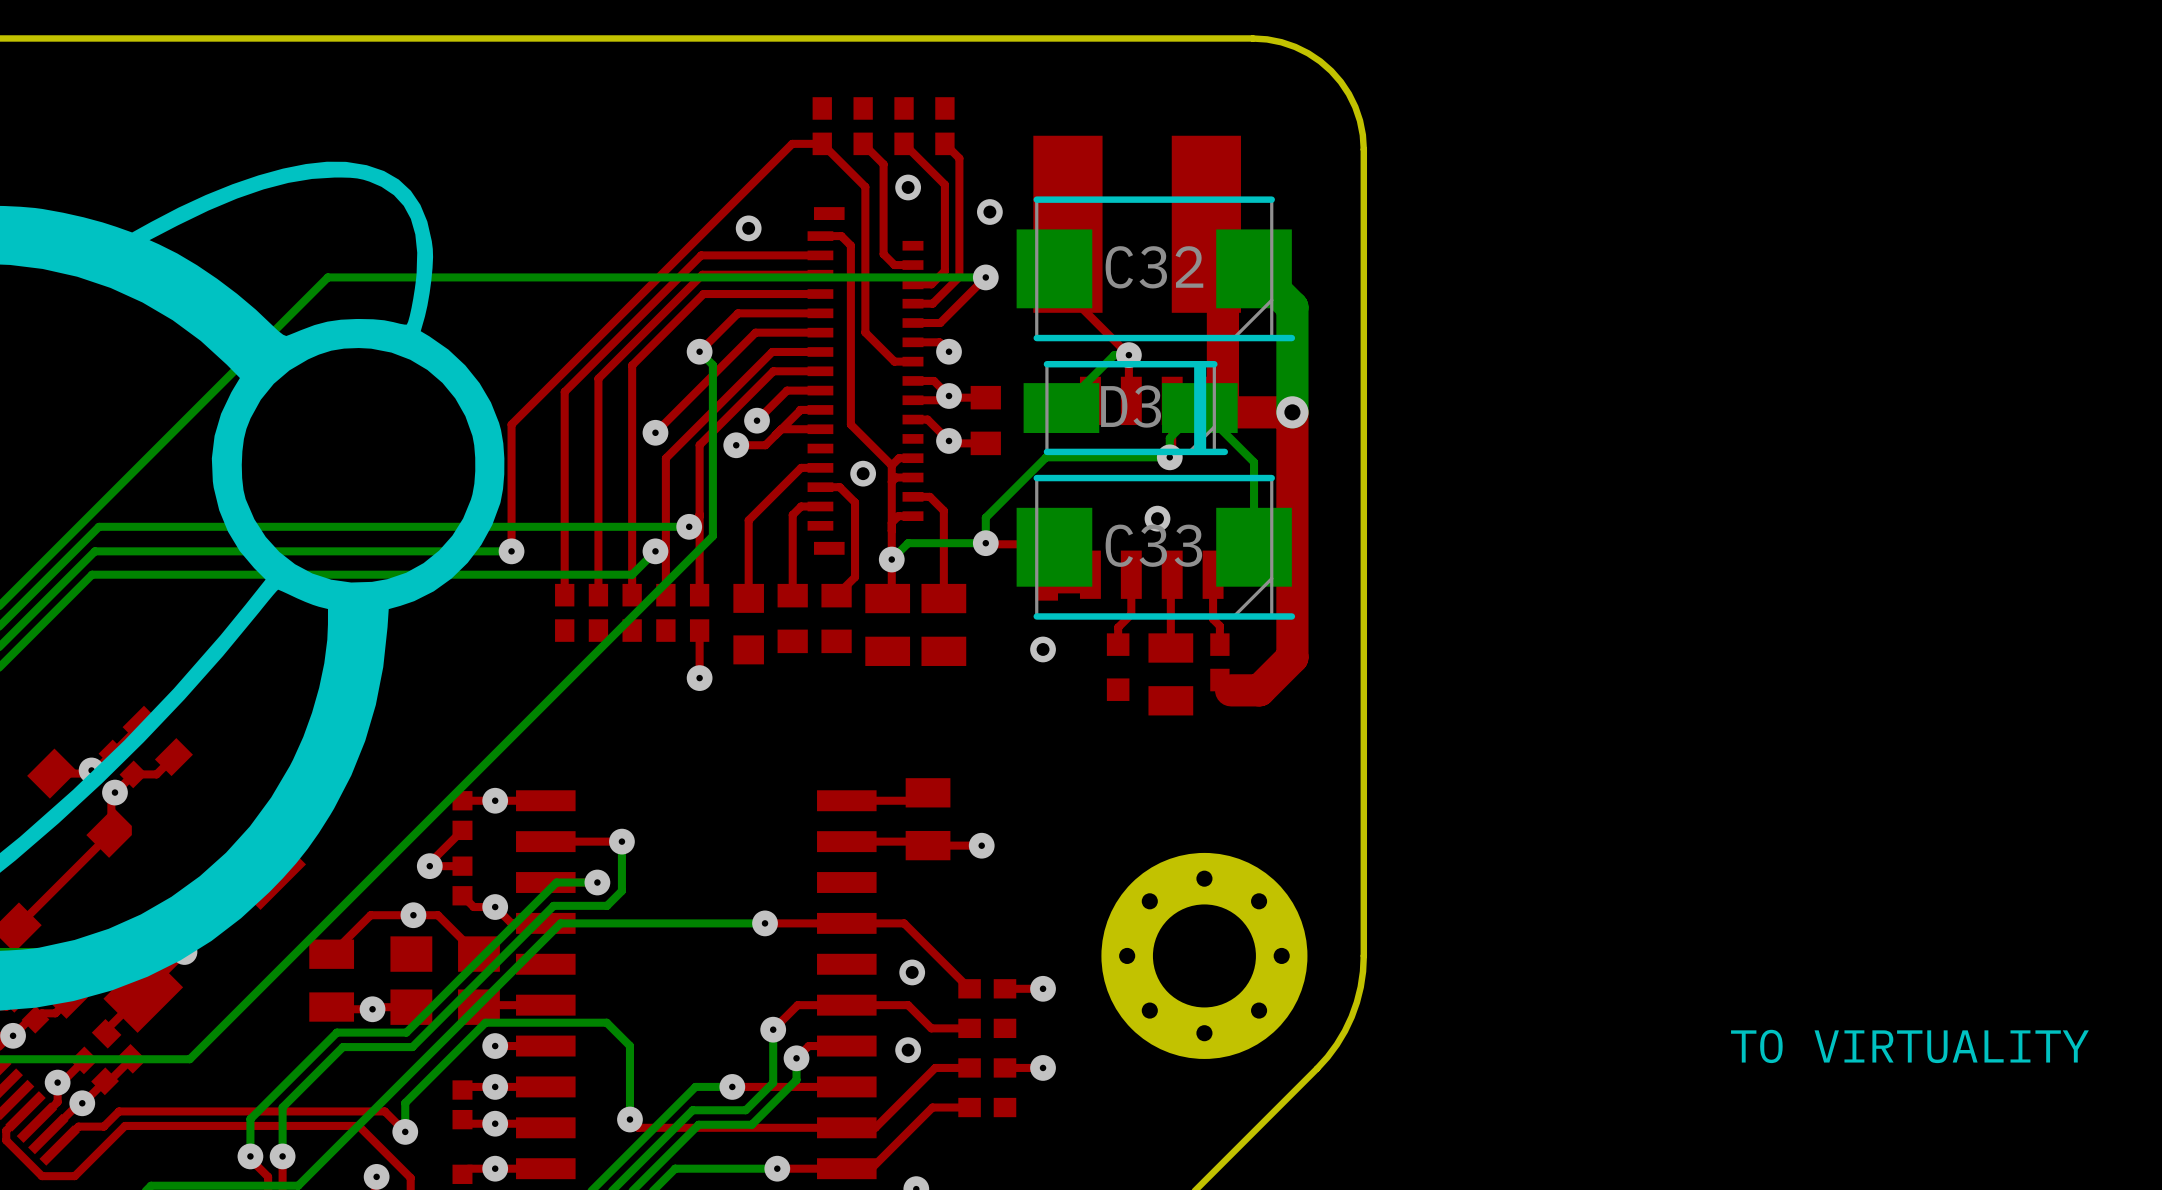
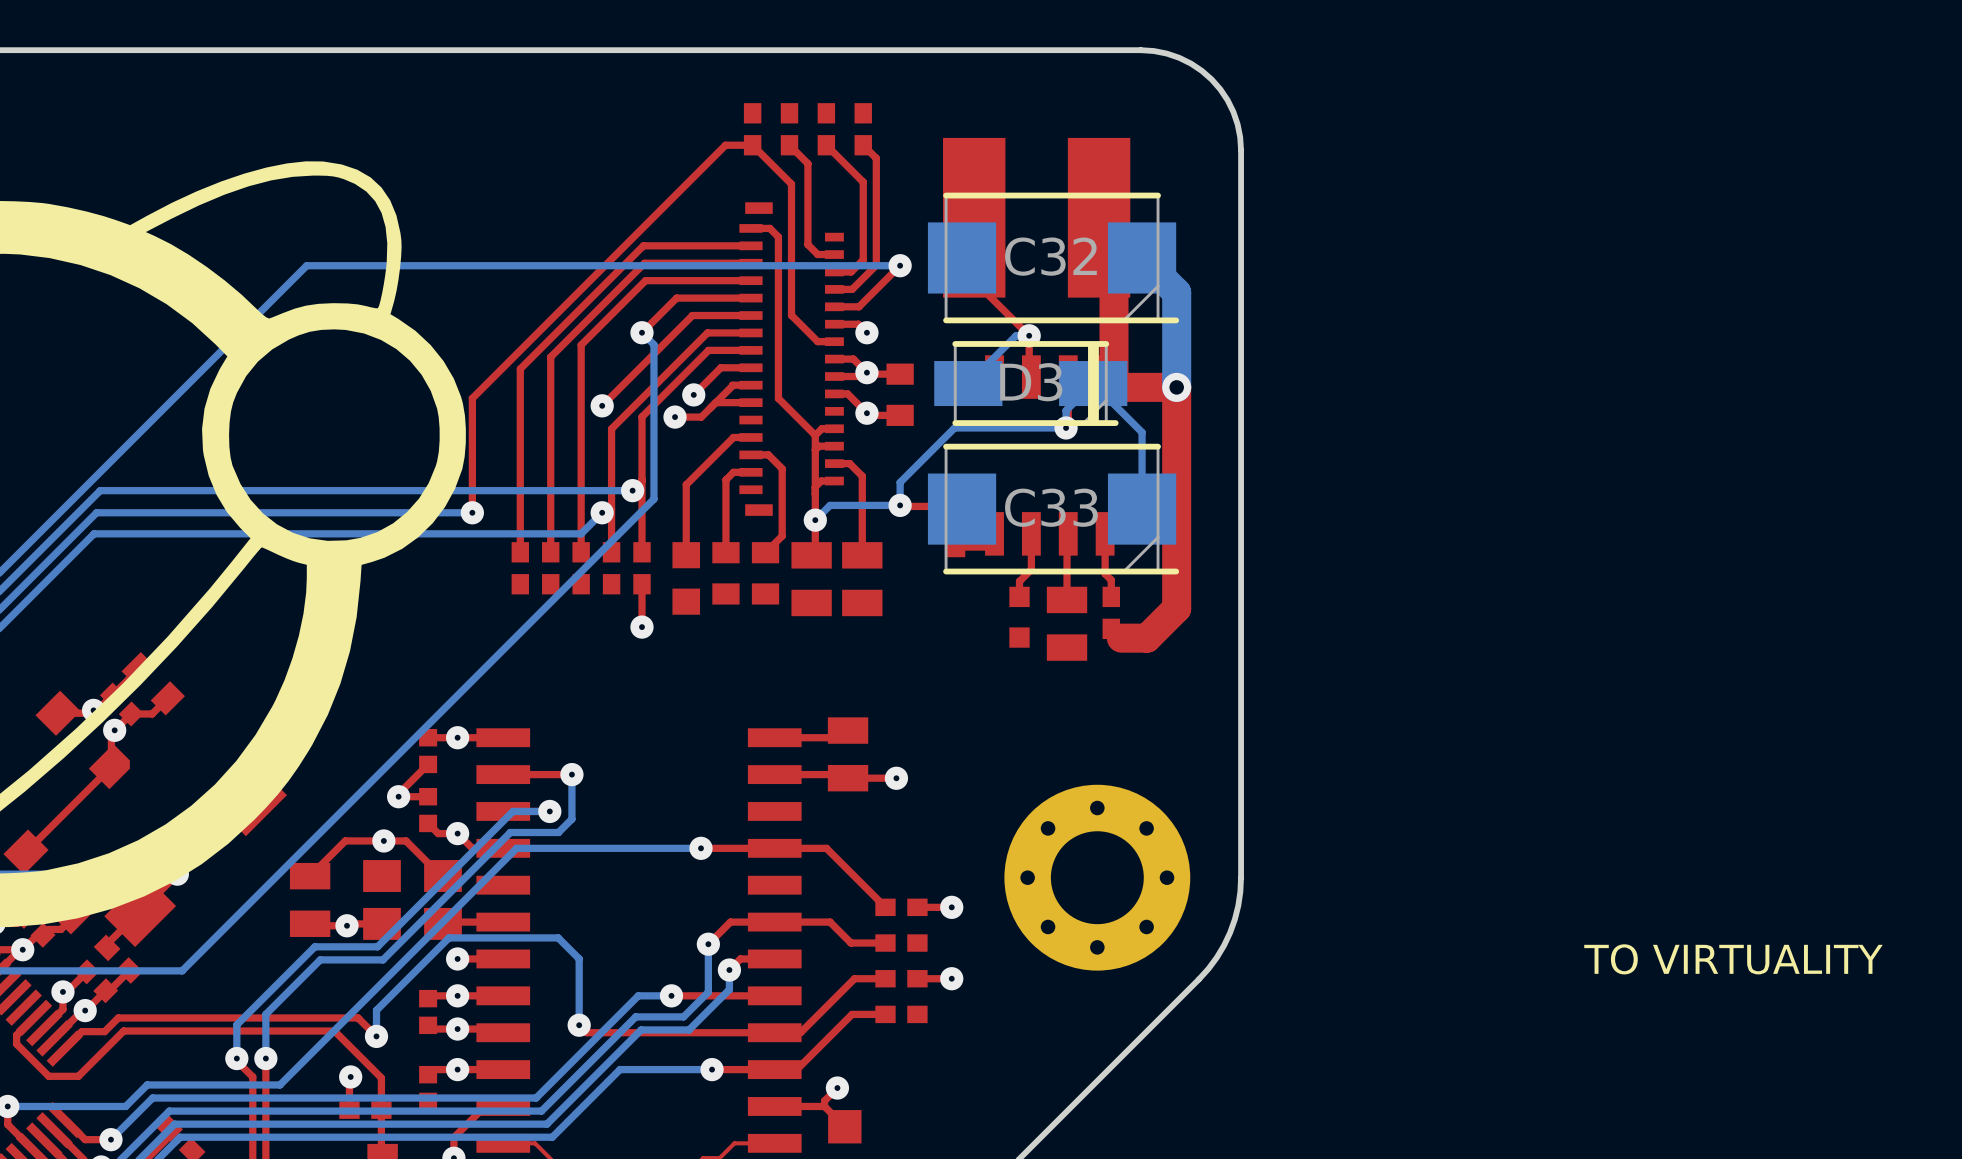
via: (908, 187) -> none
via: (989, 212) -> none
via: (748, 228) -> none
via: (863, 473) -> none
via: (1157, 518) -> none
via: (1043, 649) -> none
via: (912, 972) -> none
via: (908, 1050) -> none

